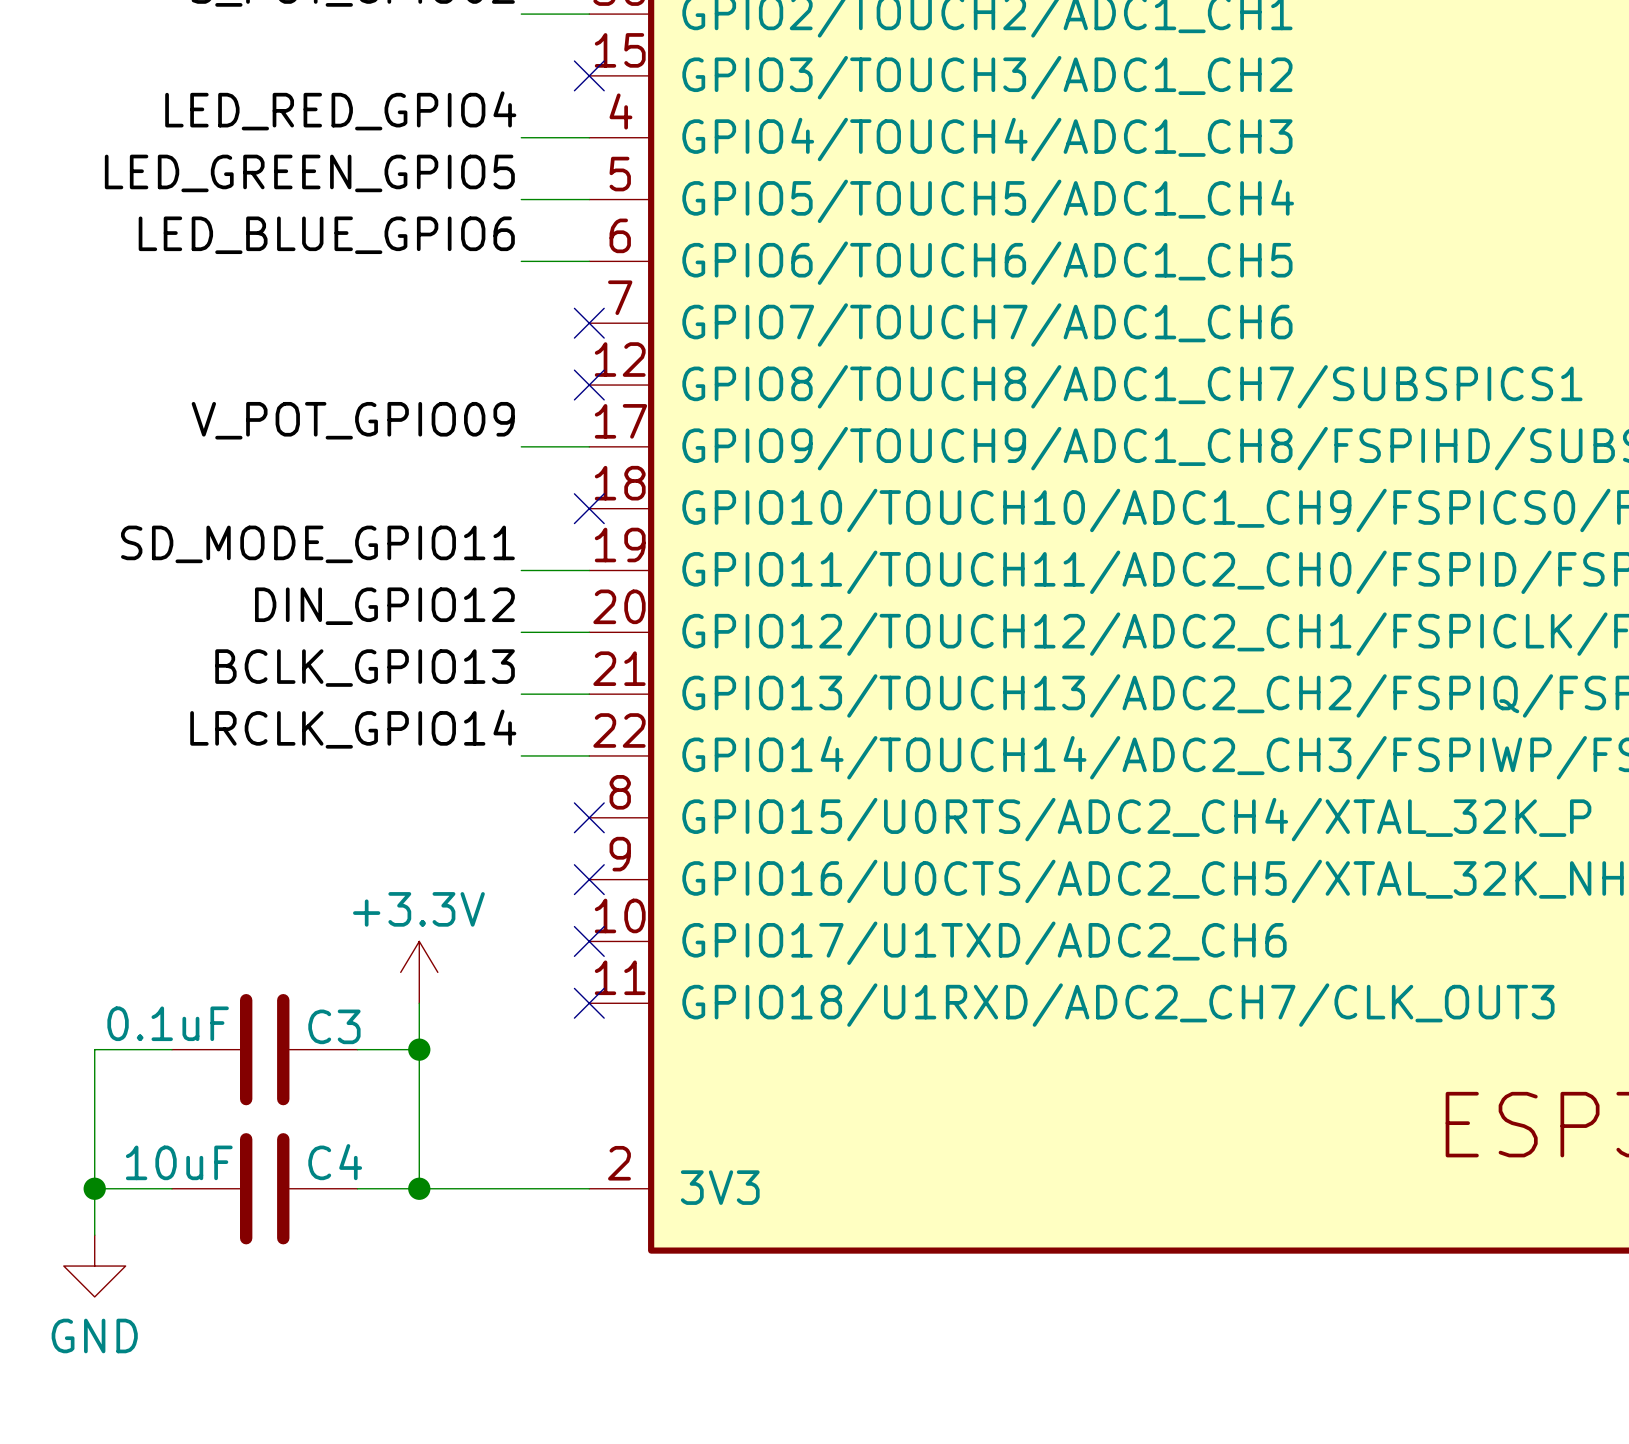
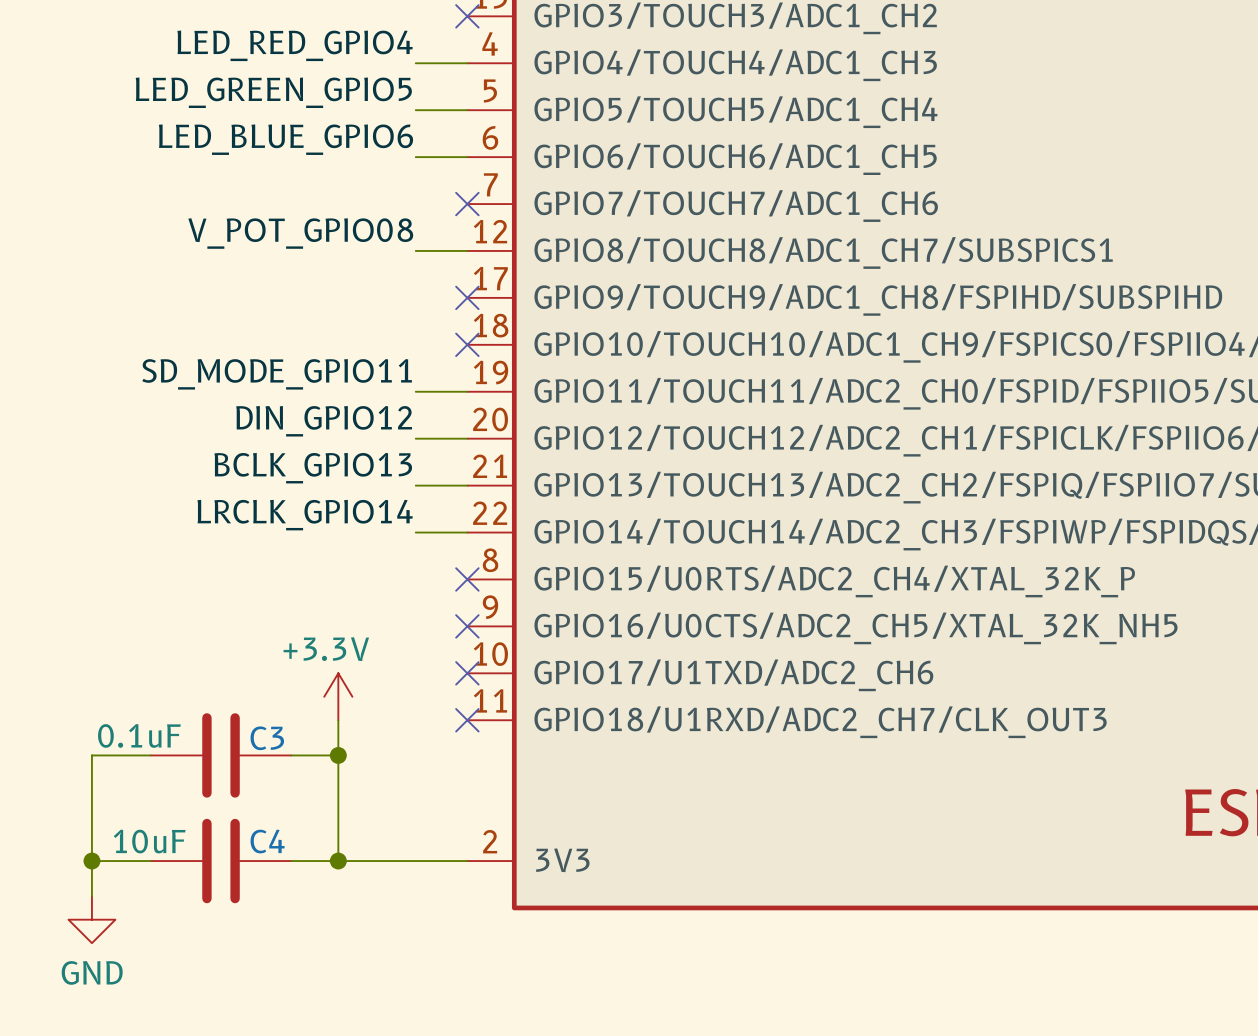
no-connect mark position: (589, 385) -> (467, 297)
label: V_POT_GPIO09 (353, 420) -> V_POT_GPIO08 (300, 233)
wire: (521, 446) (589, 446) -> (415, 250) (467, 250)

